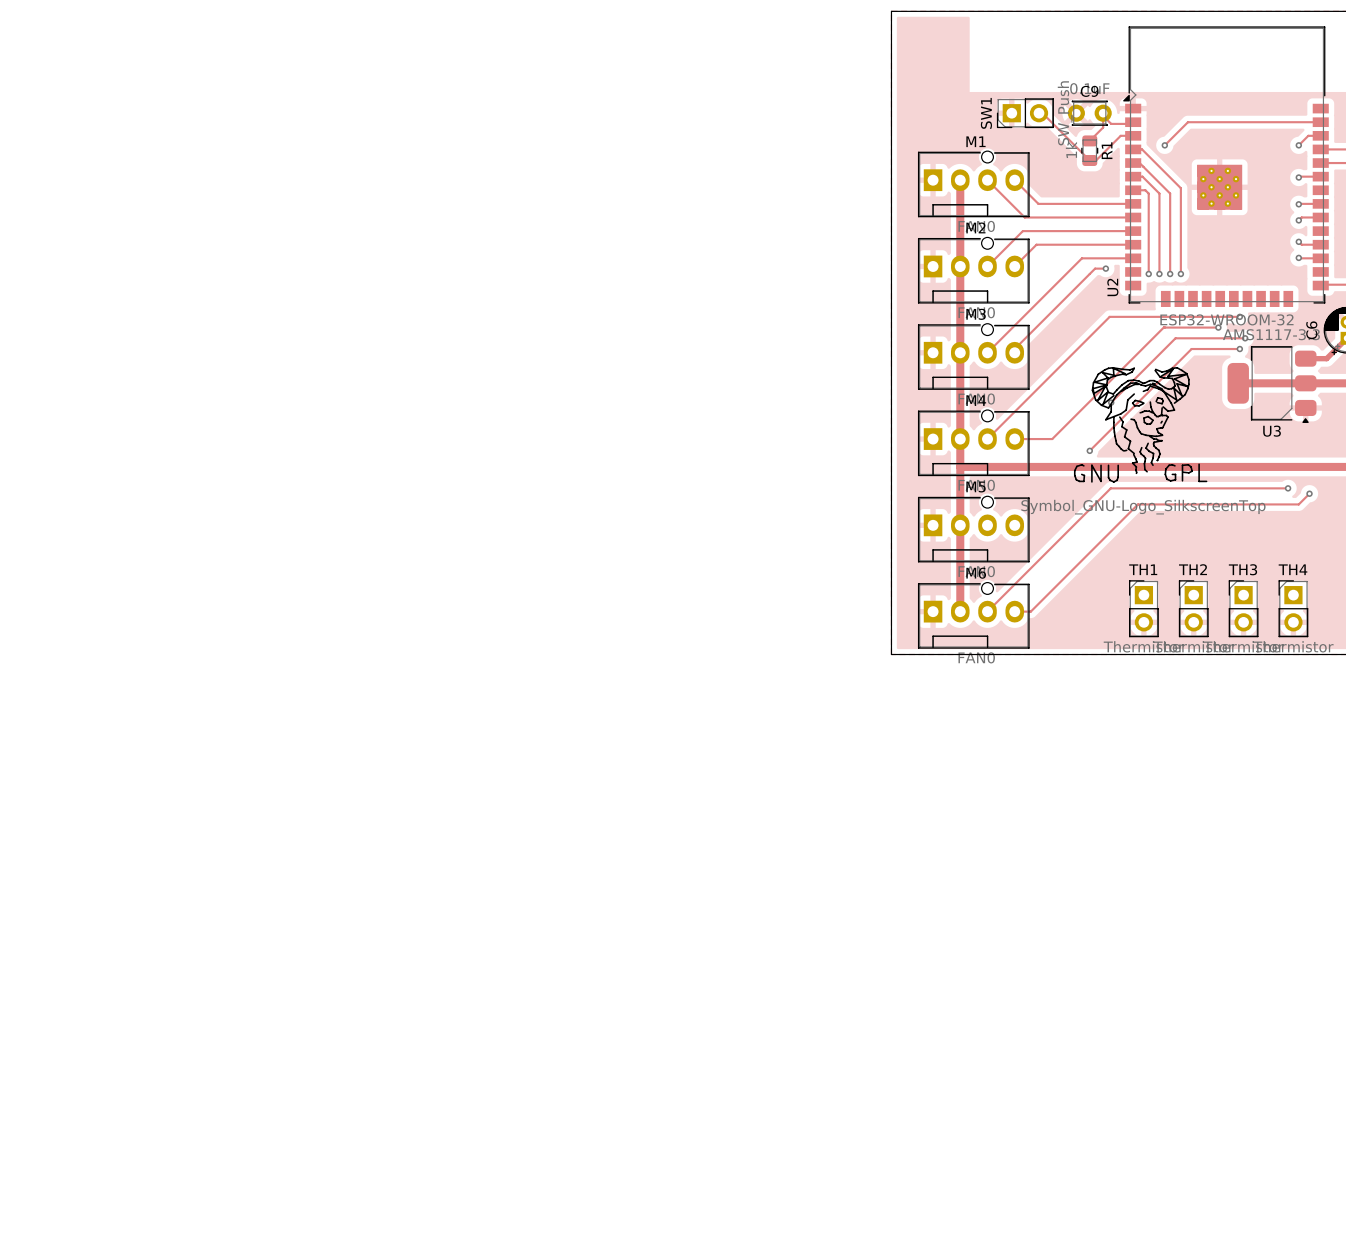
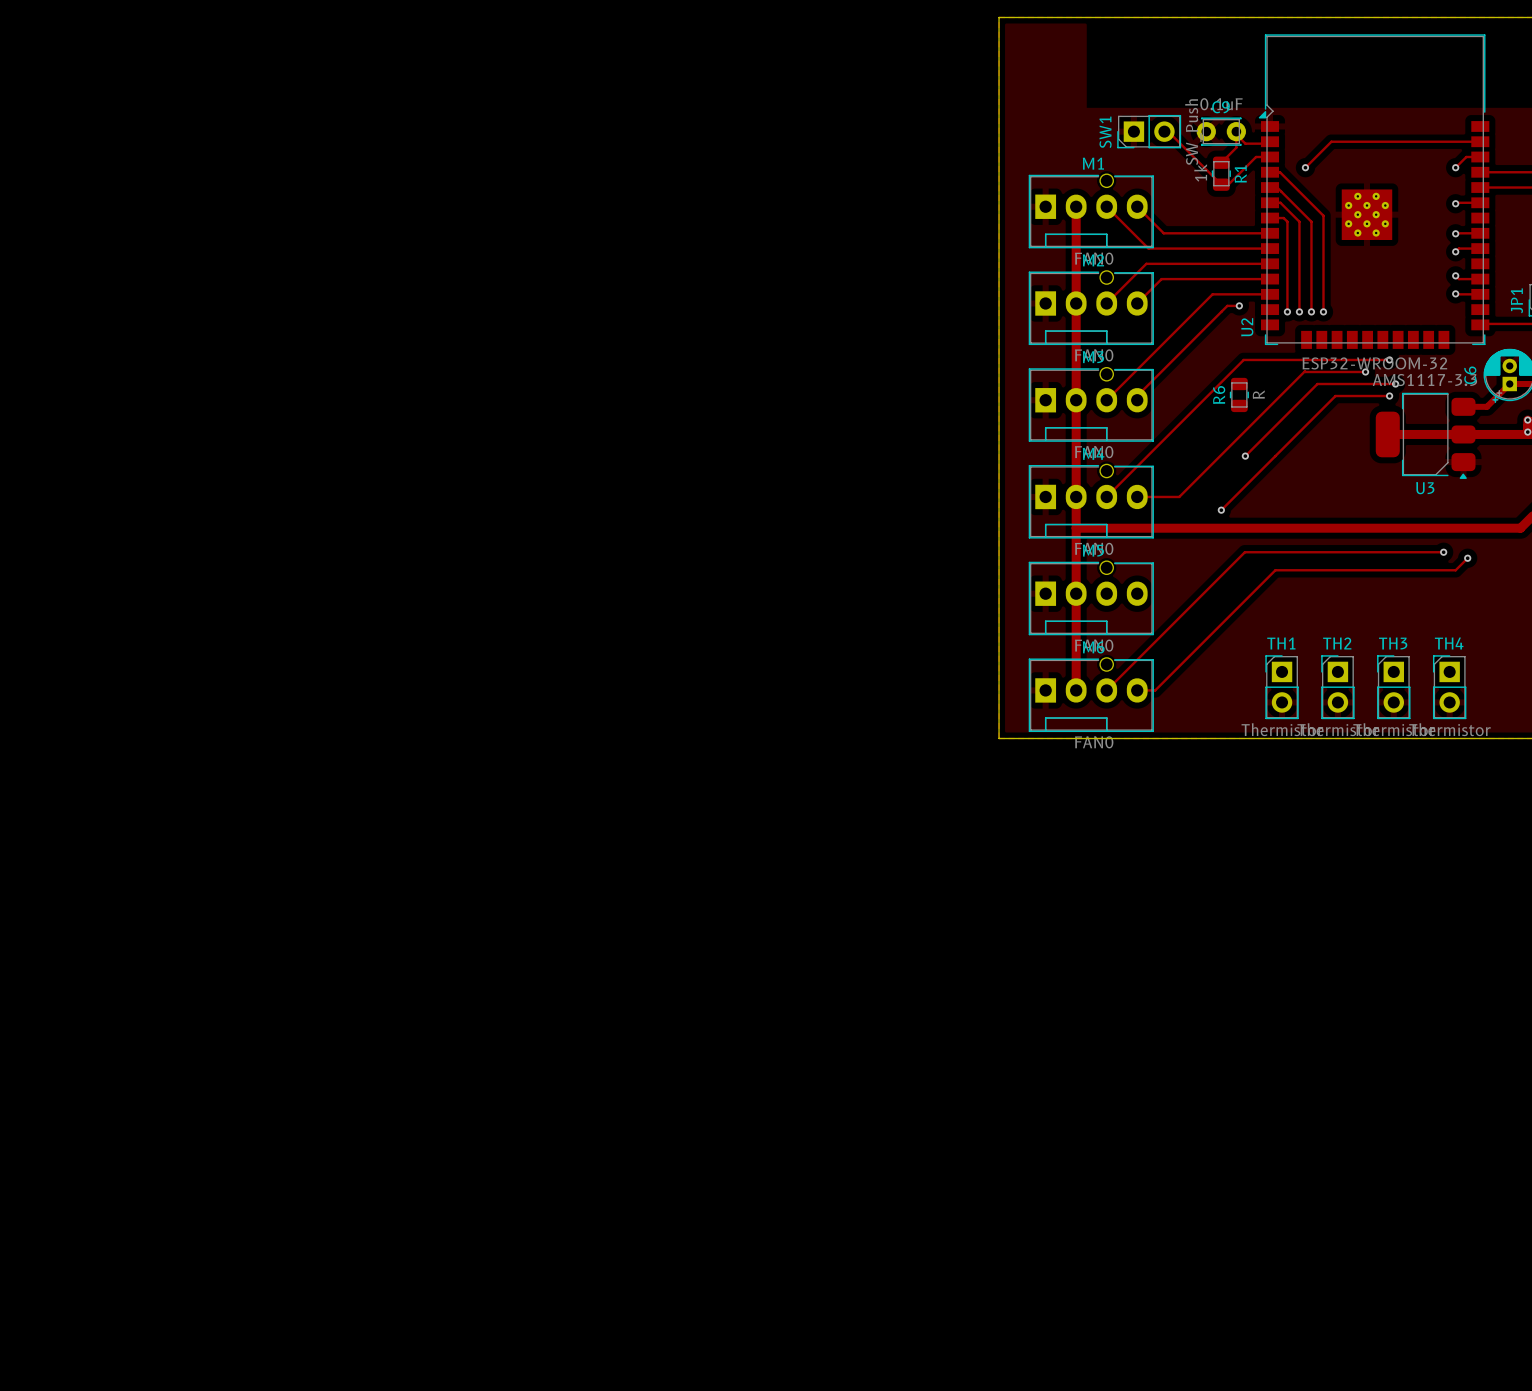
R6: none -> R (1239, 394)
drawing: [1073, 366, 1208, 483] -> none

